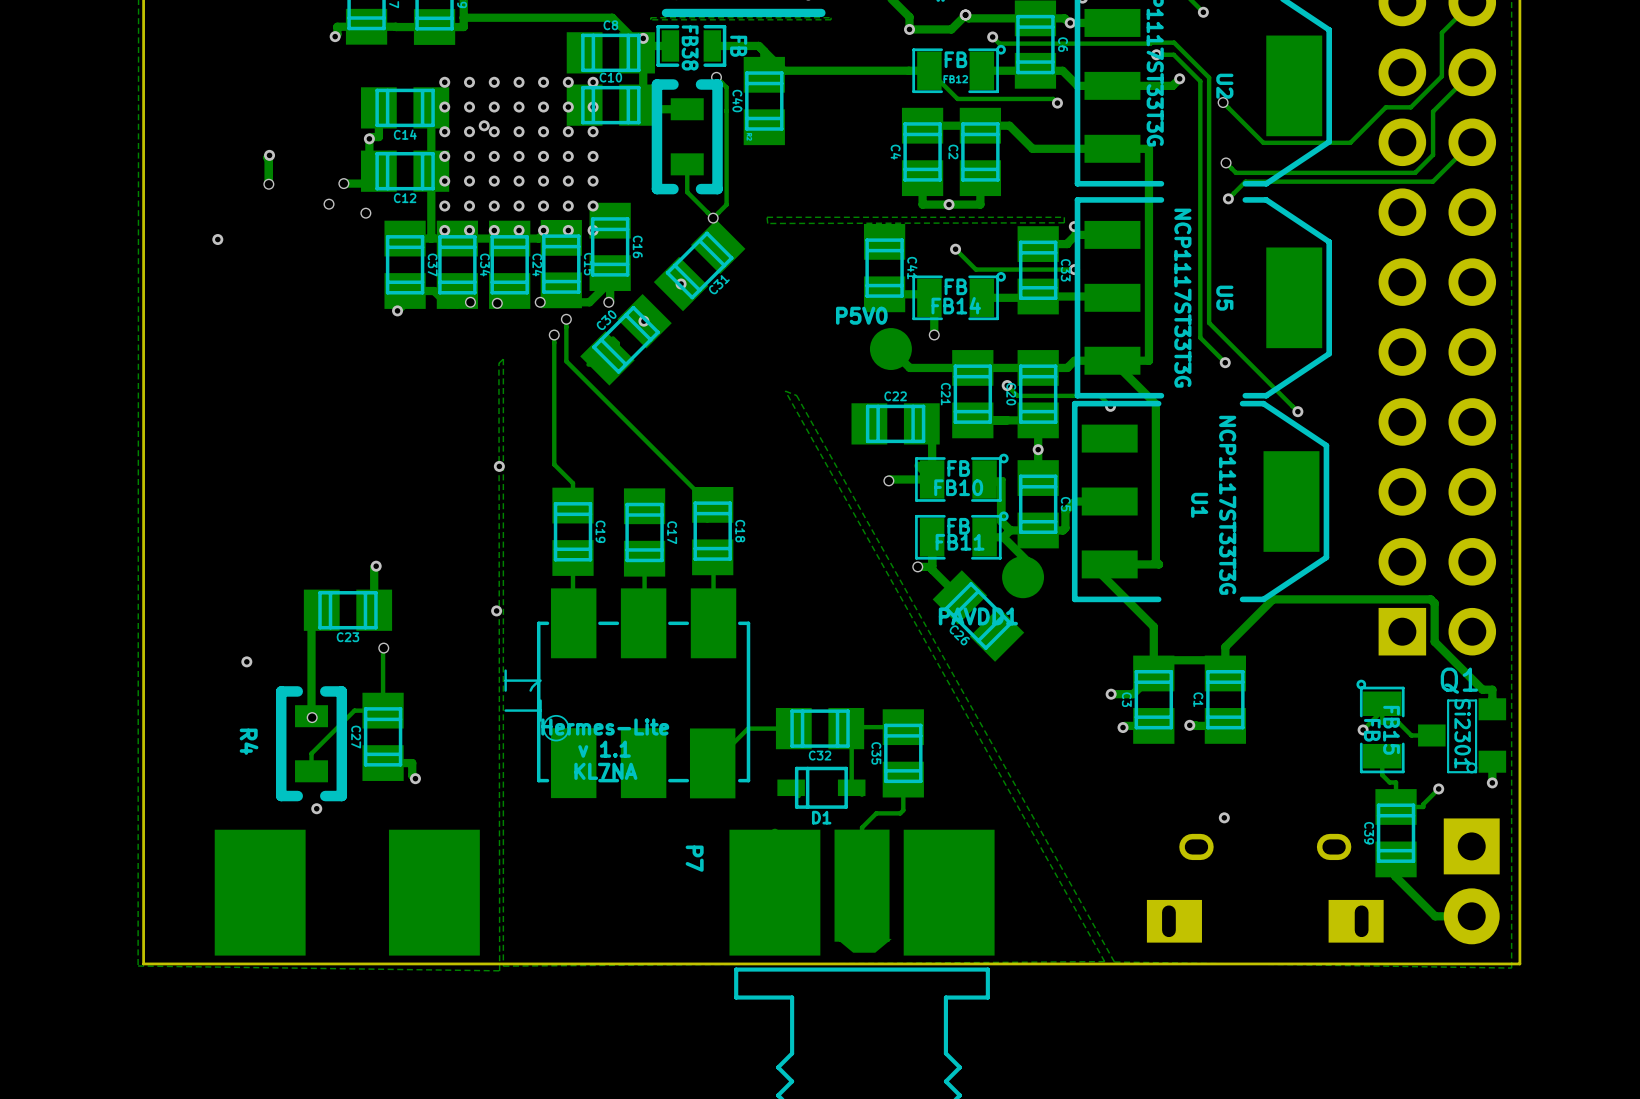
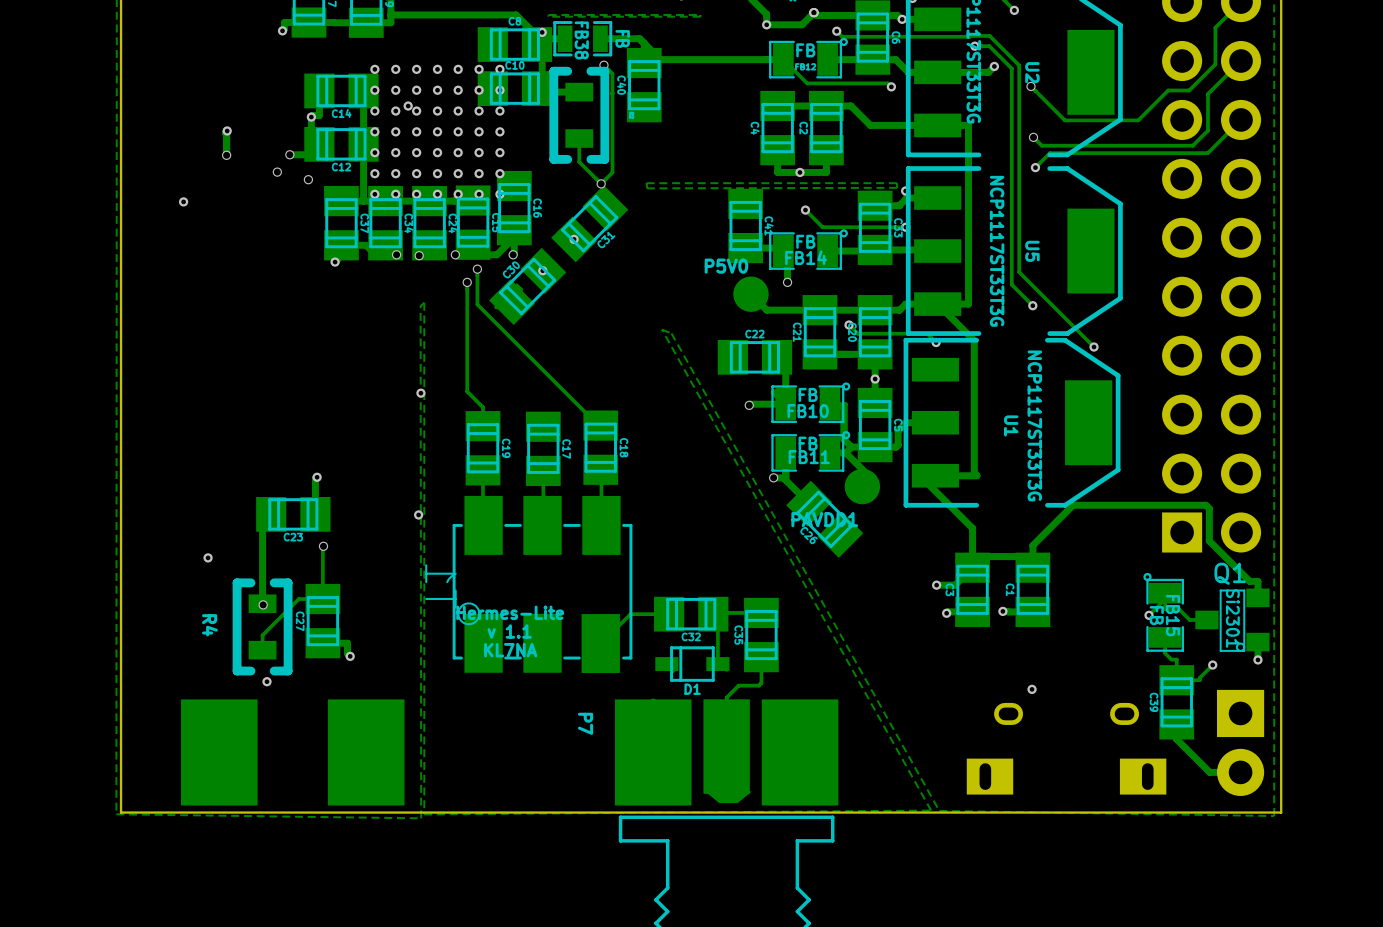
line: (821, 12) (665, 12) -> none

